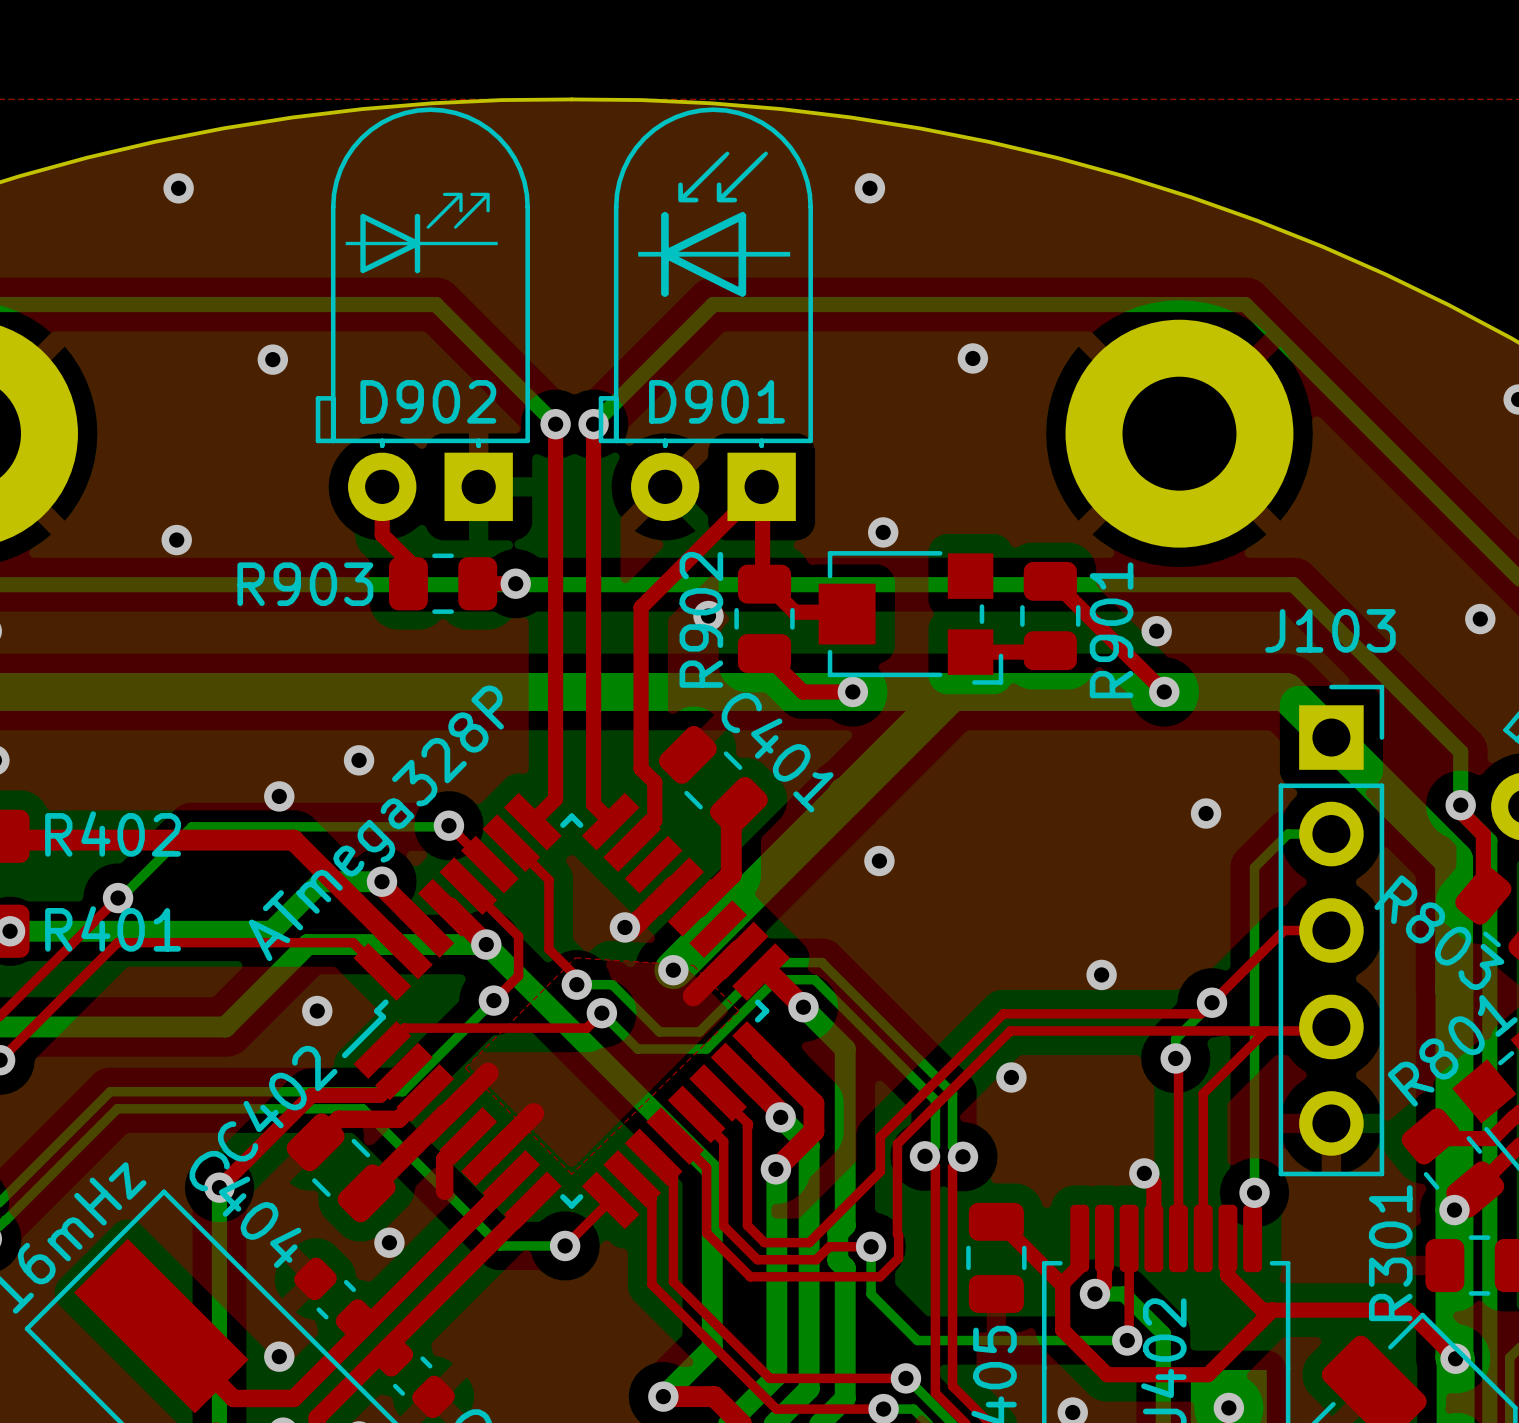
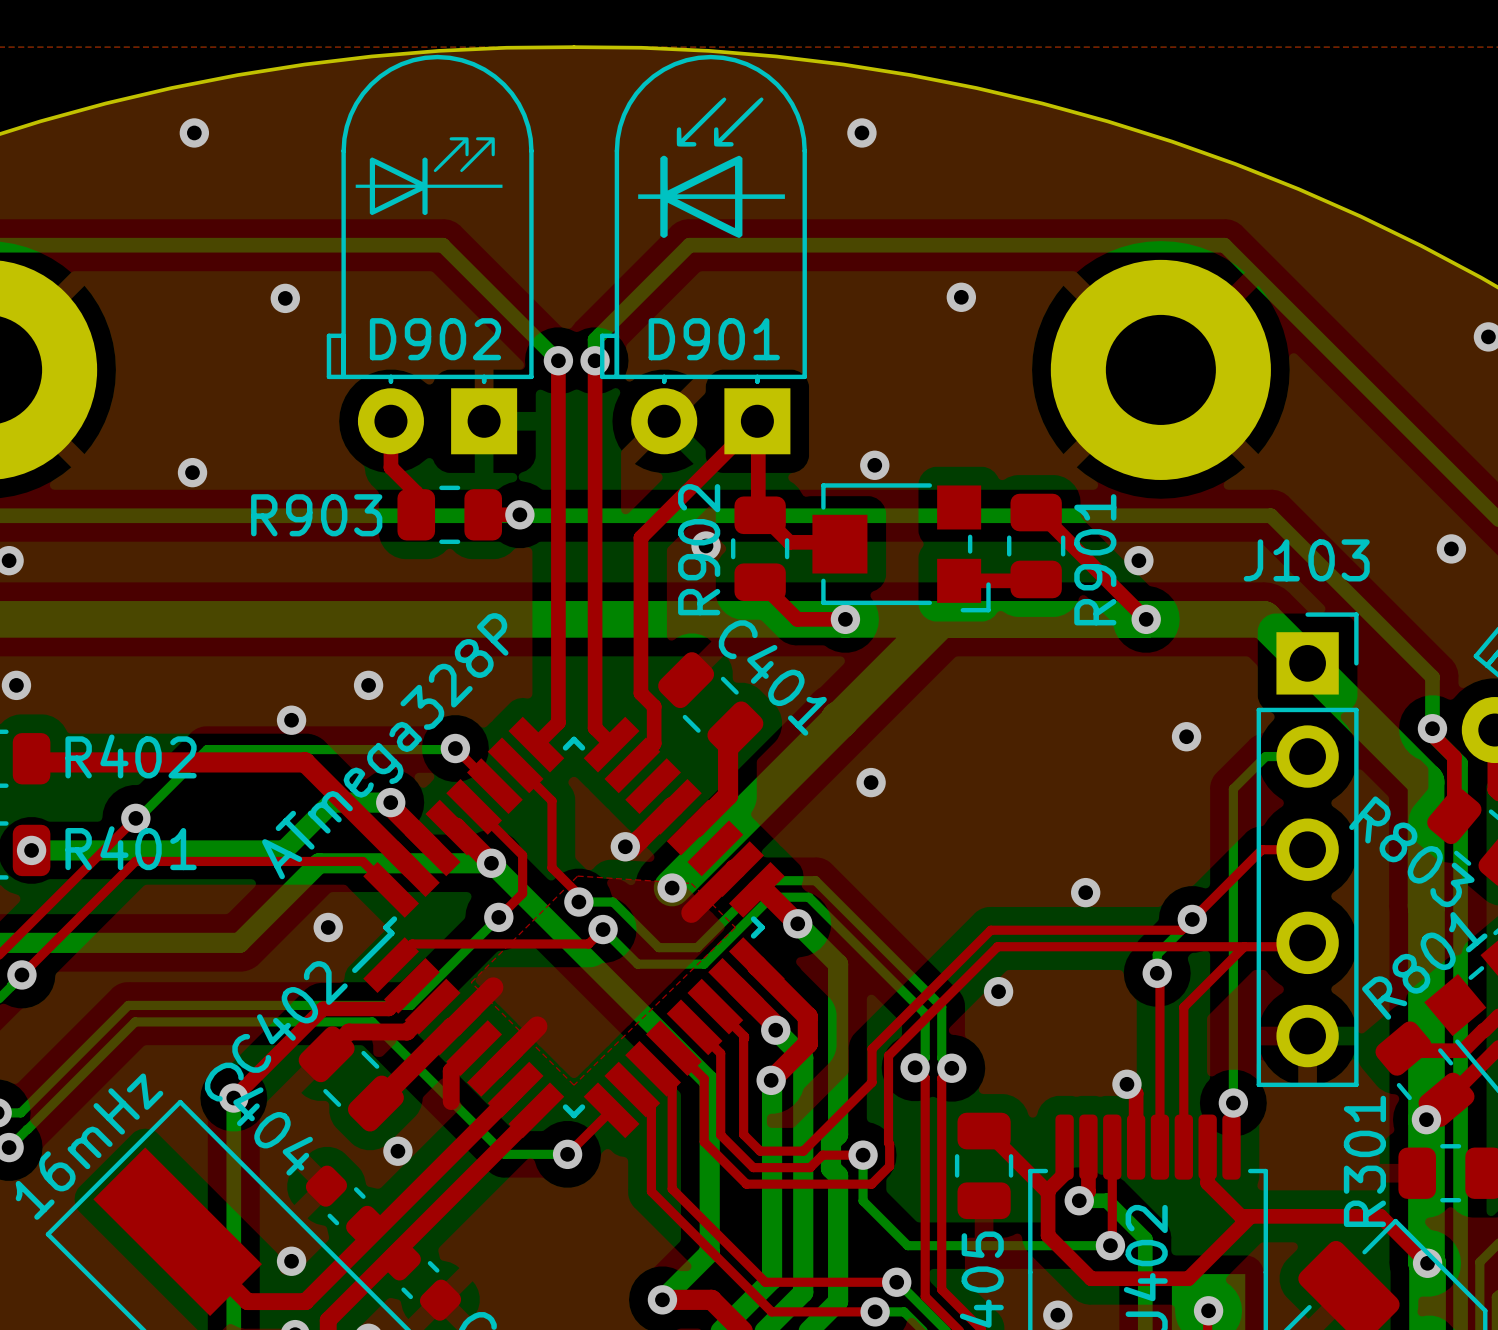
bottom track: (713, 304) (593, 424) -> (710, 245) (689, 245) (595, 339) (595, 360)

